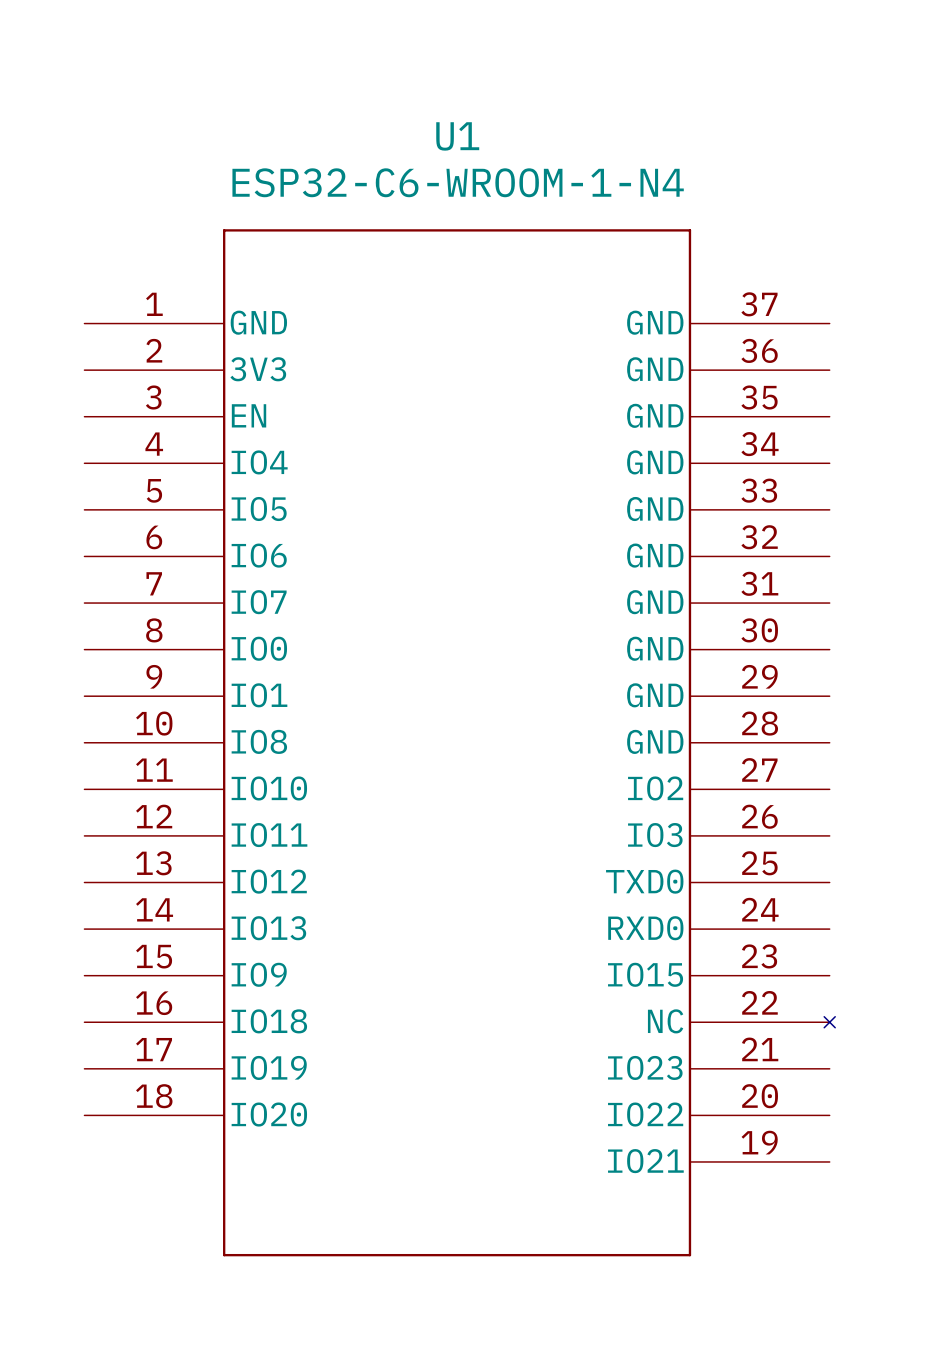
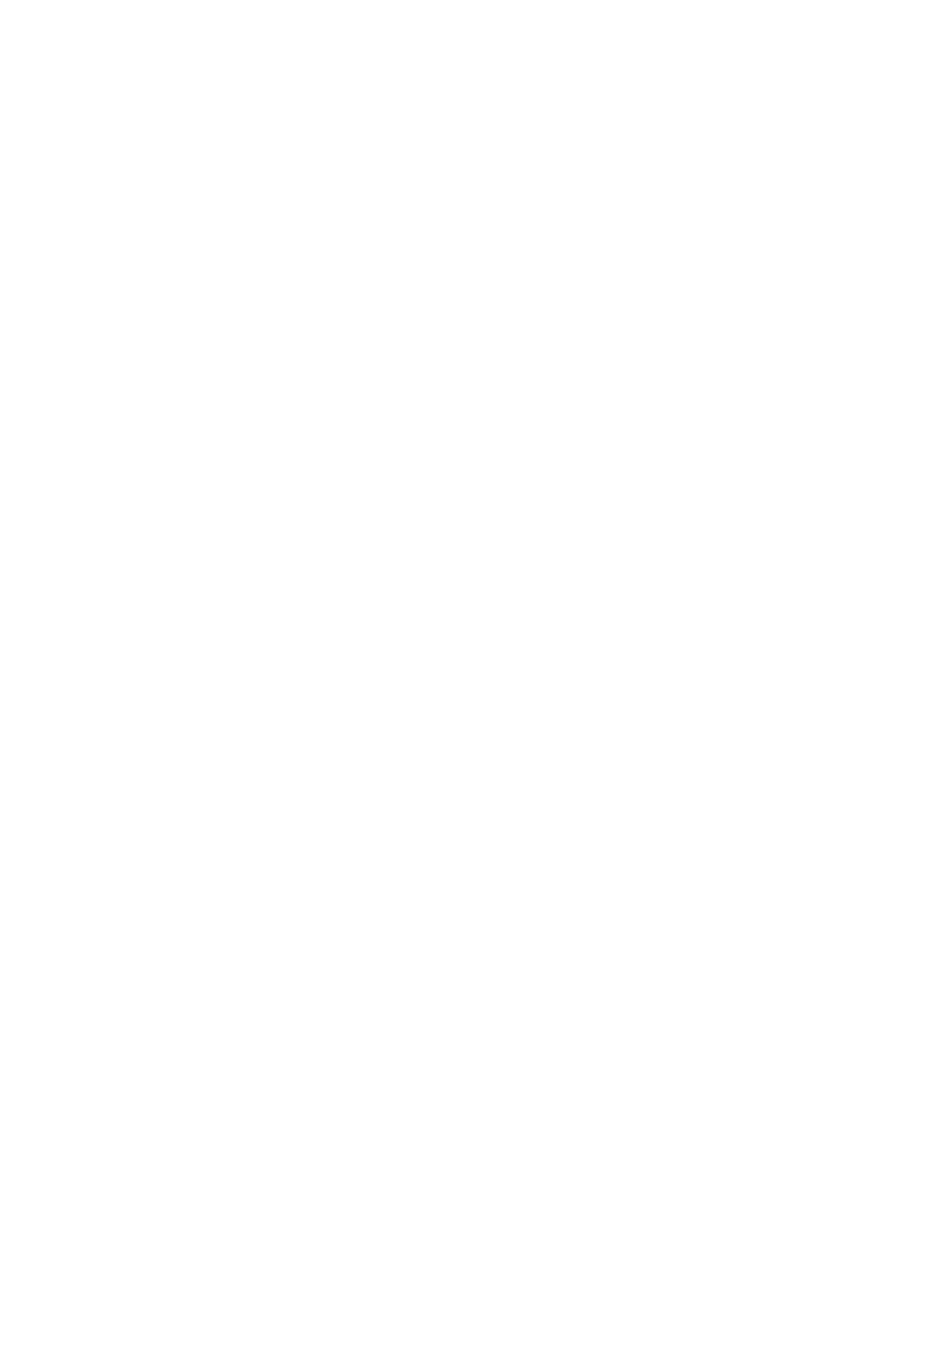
U1: ESP32-C6-WROOM-1-N4 (459, 742) -> none

